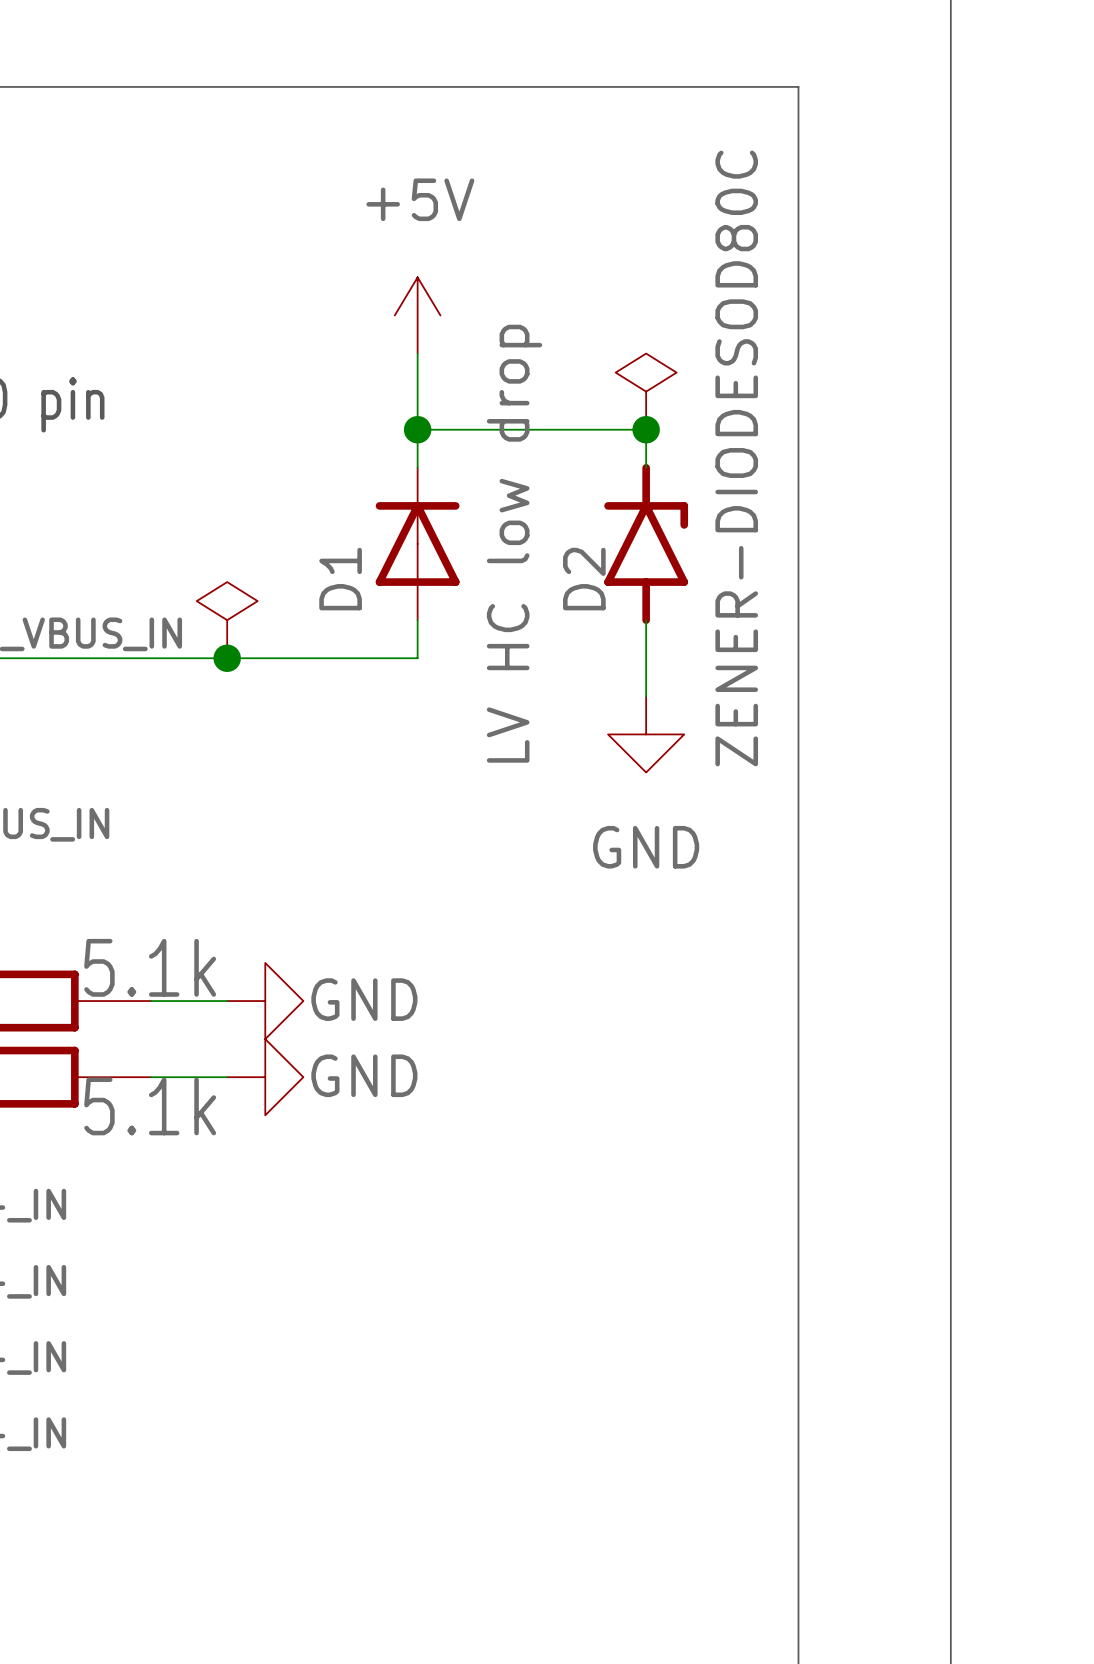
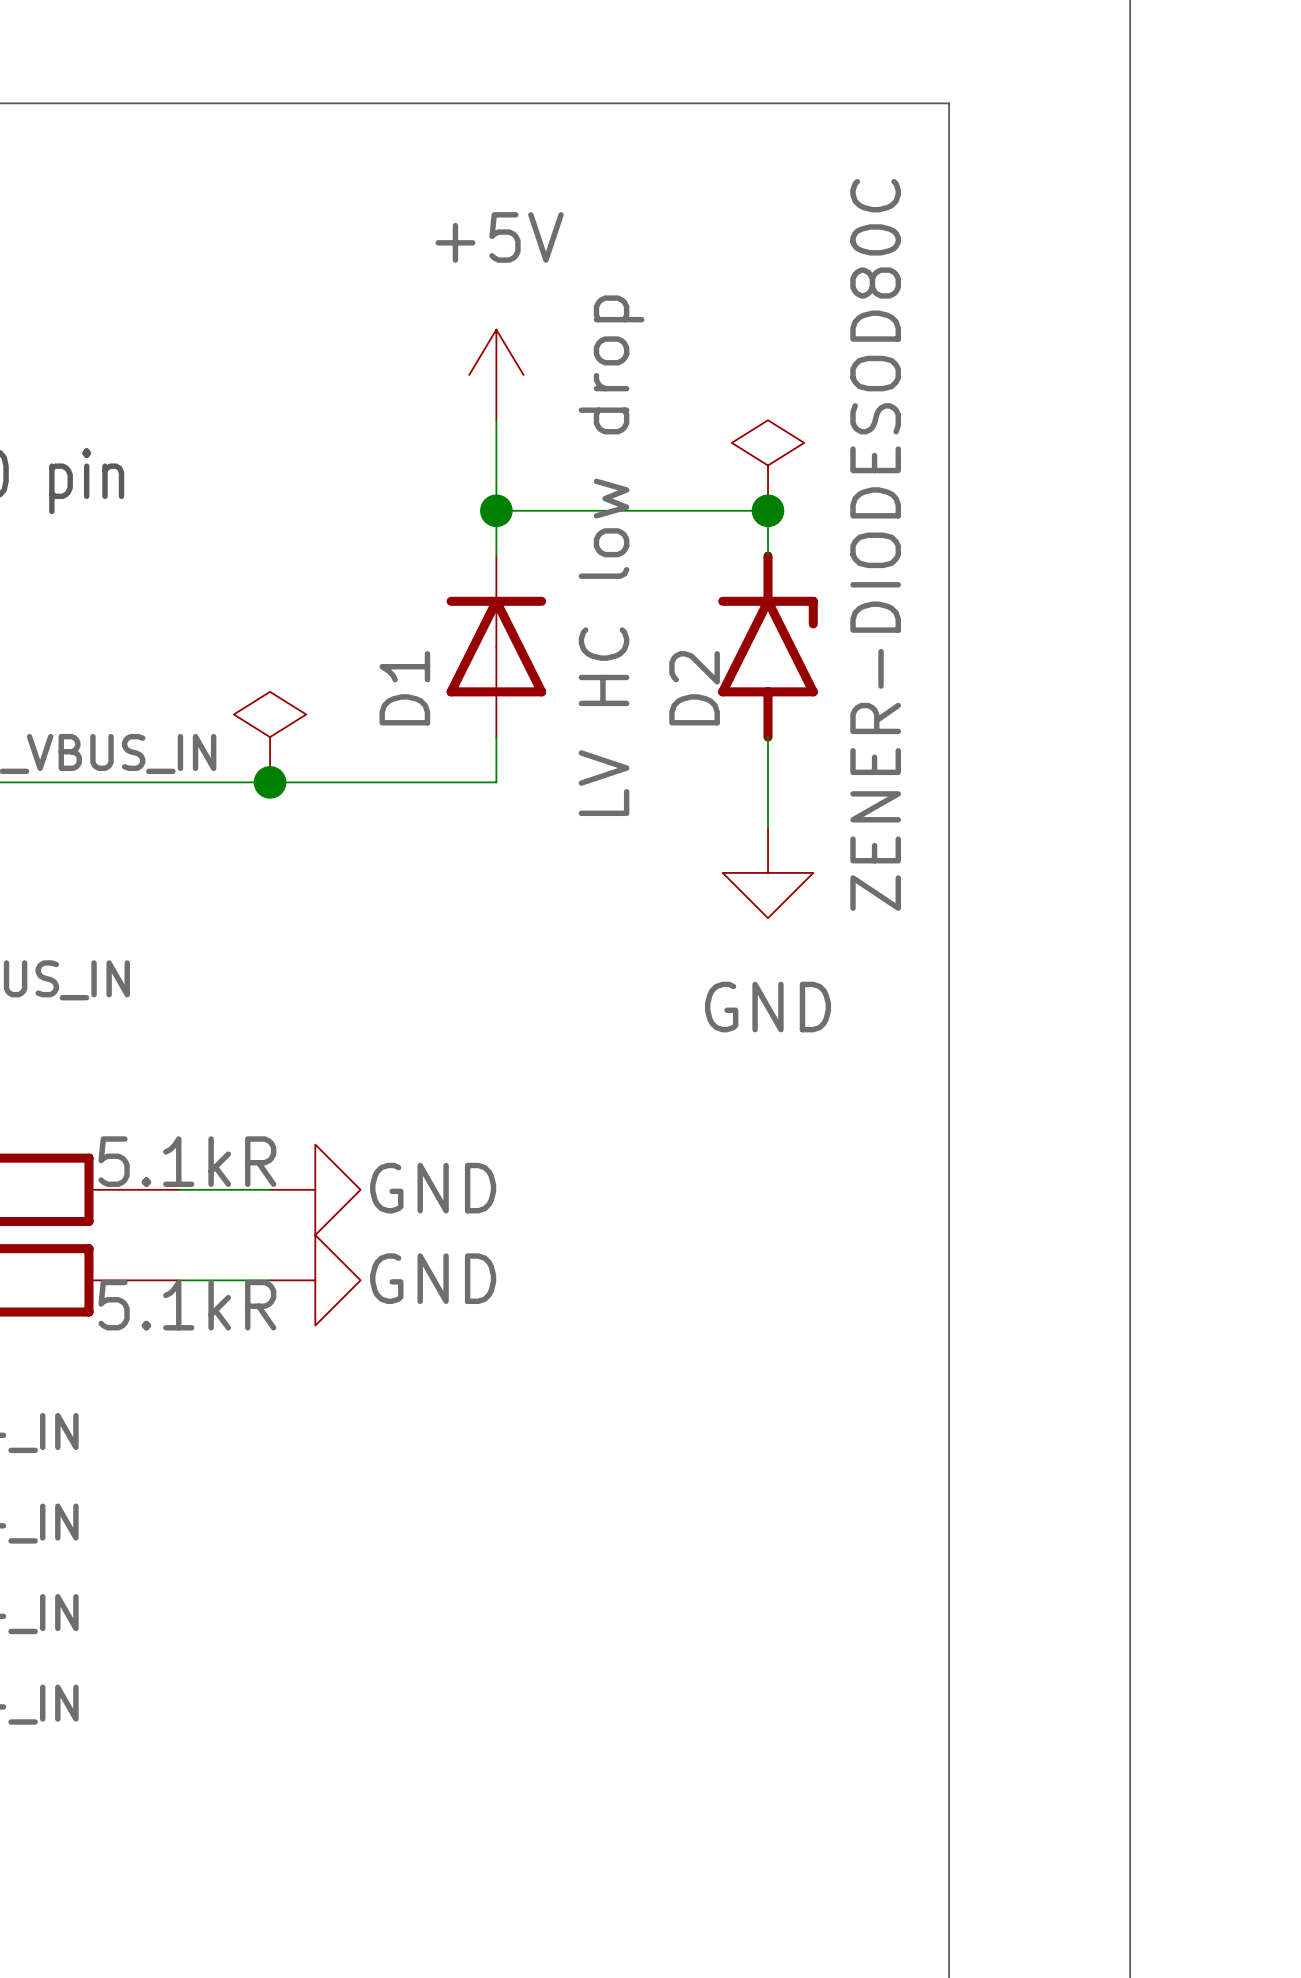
D1 value position: LV HC low drop (514, 543) -> LV HC low drop (611, 555)
part value: 5.1k (150, 967) -> 5.1kR (187, 1161)
part value: 5.1k (150, 1106) -> 5.1kR (187, 1305)

